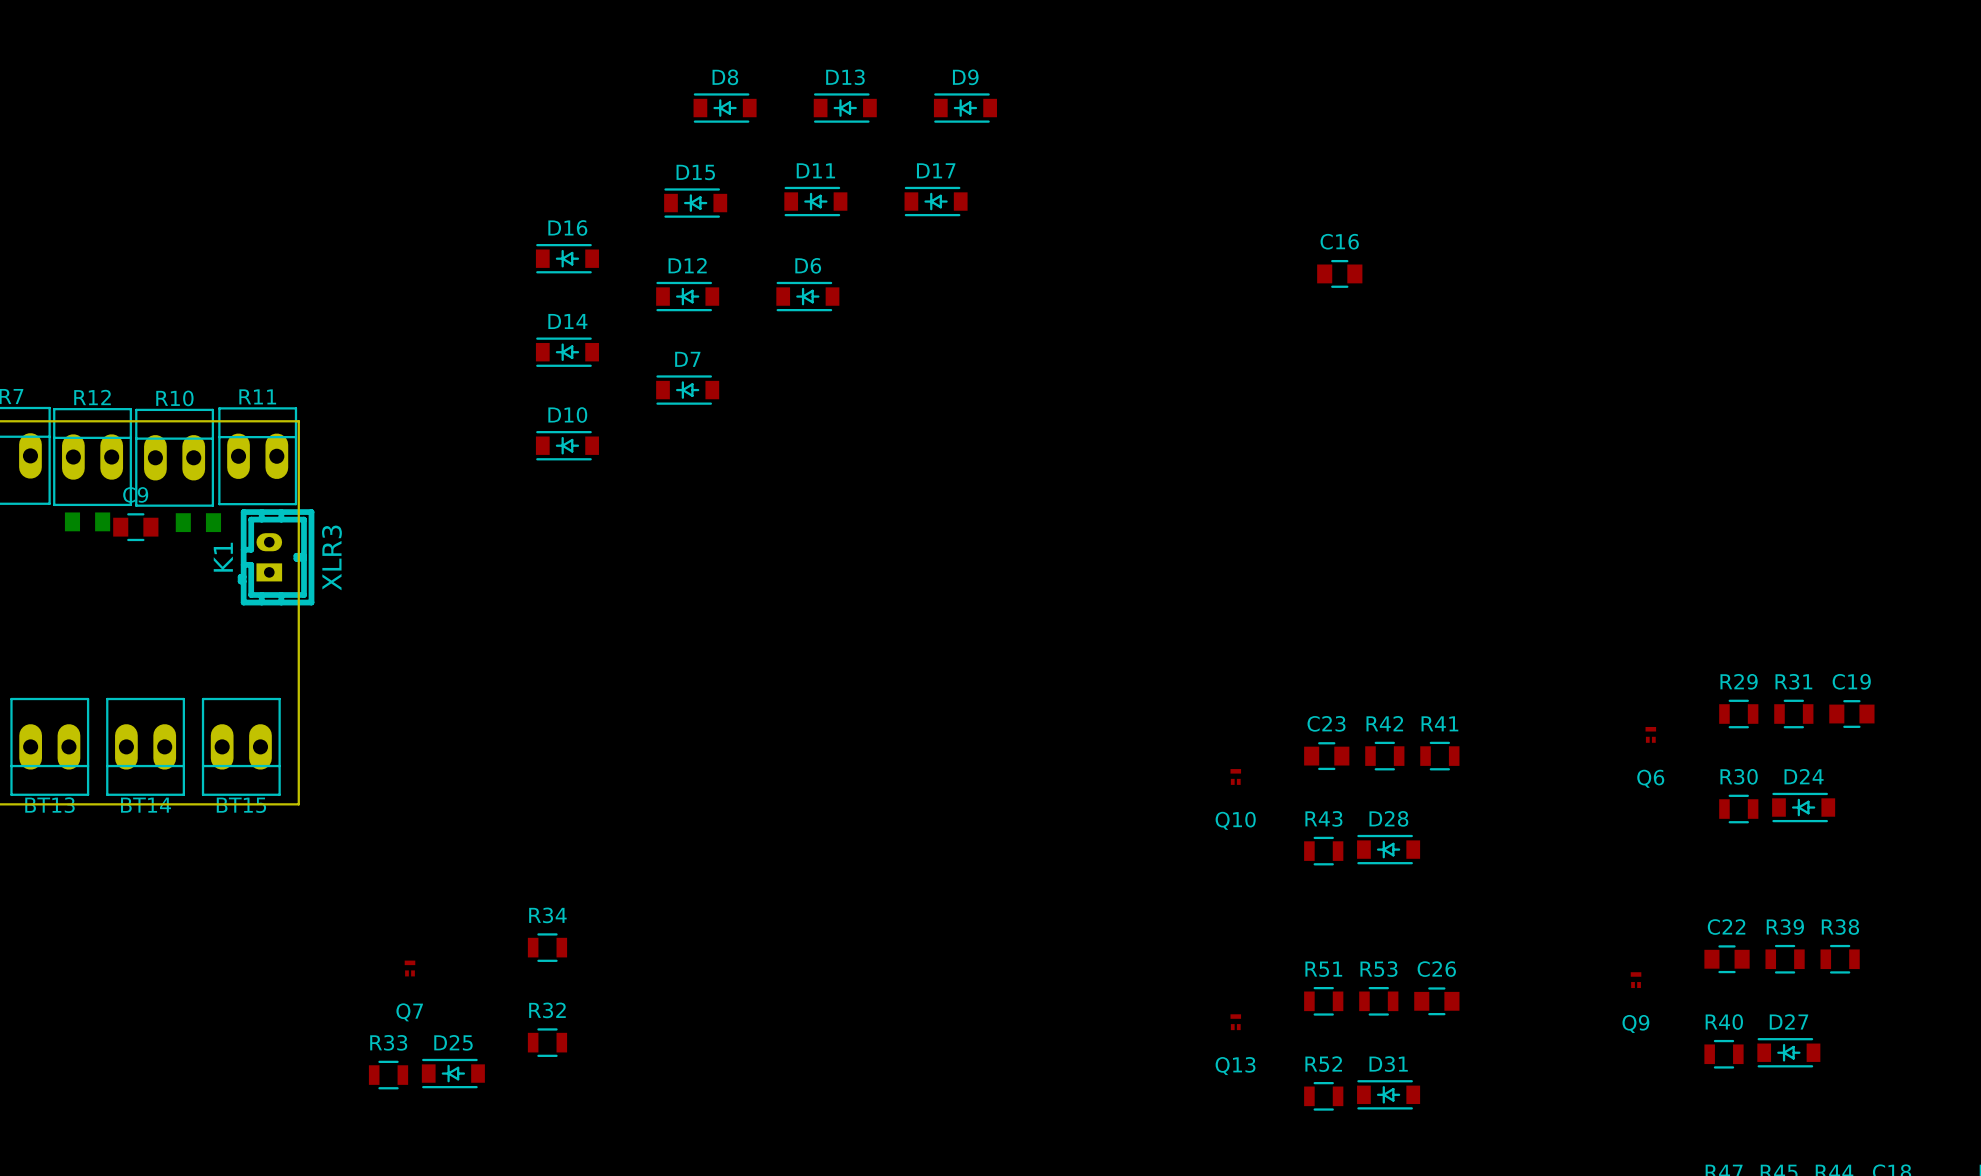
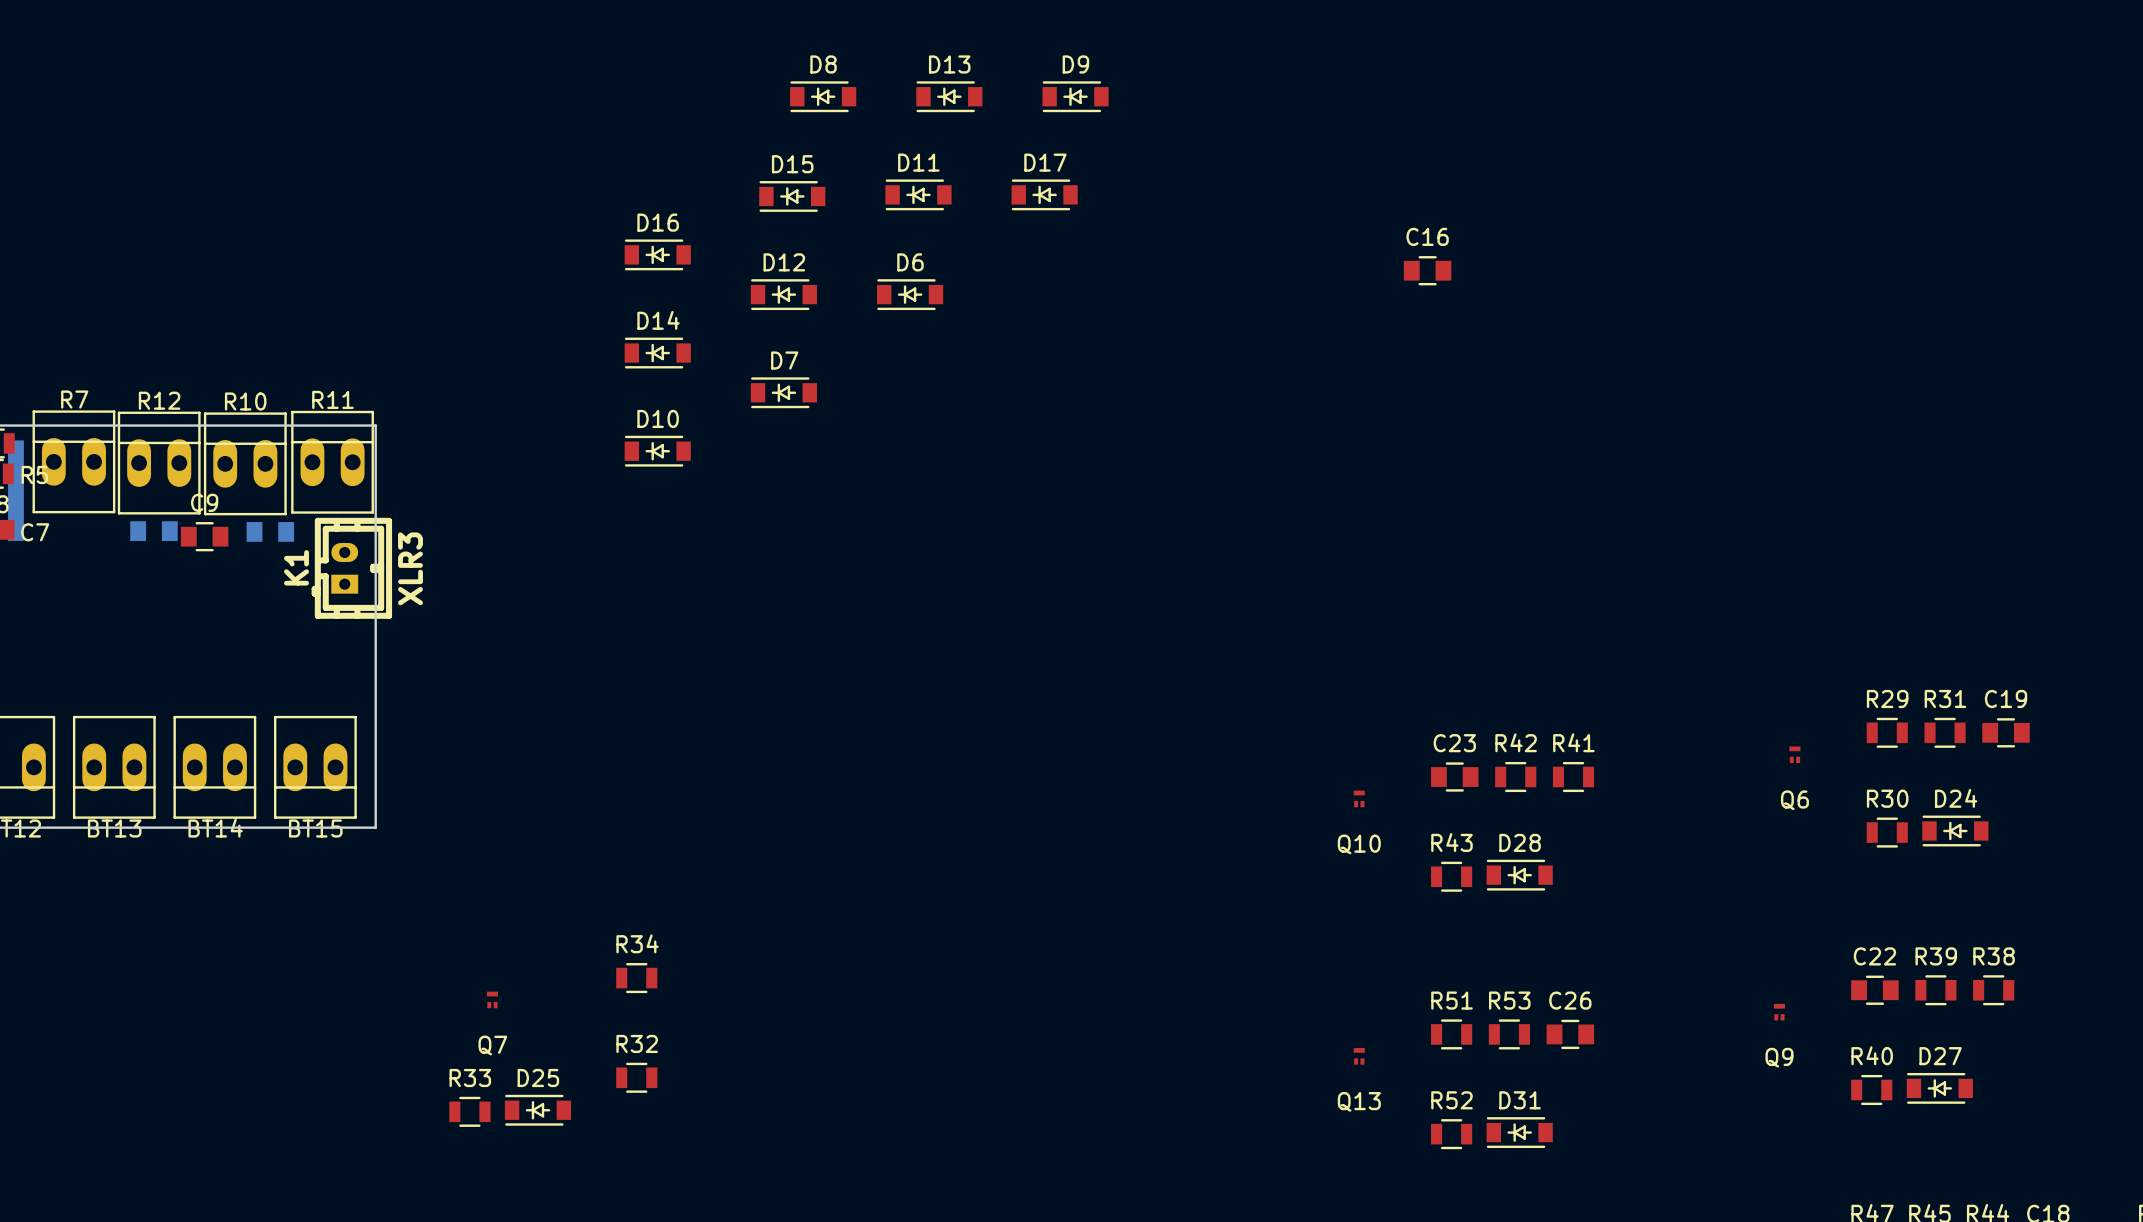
C16 position: (1339, 273) -> (1427, 270)

